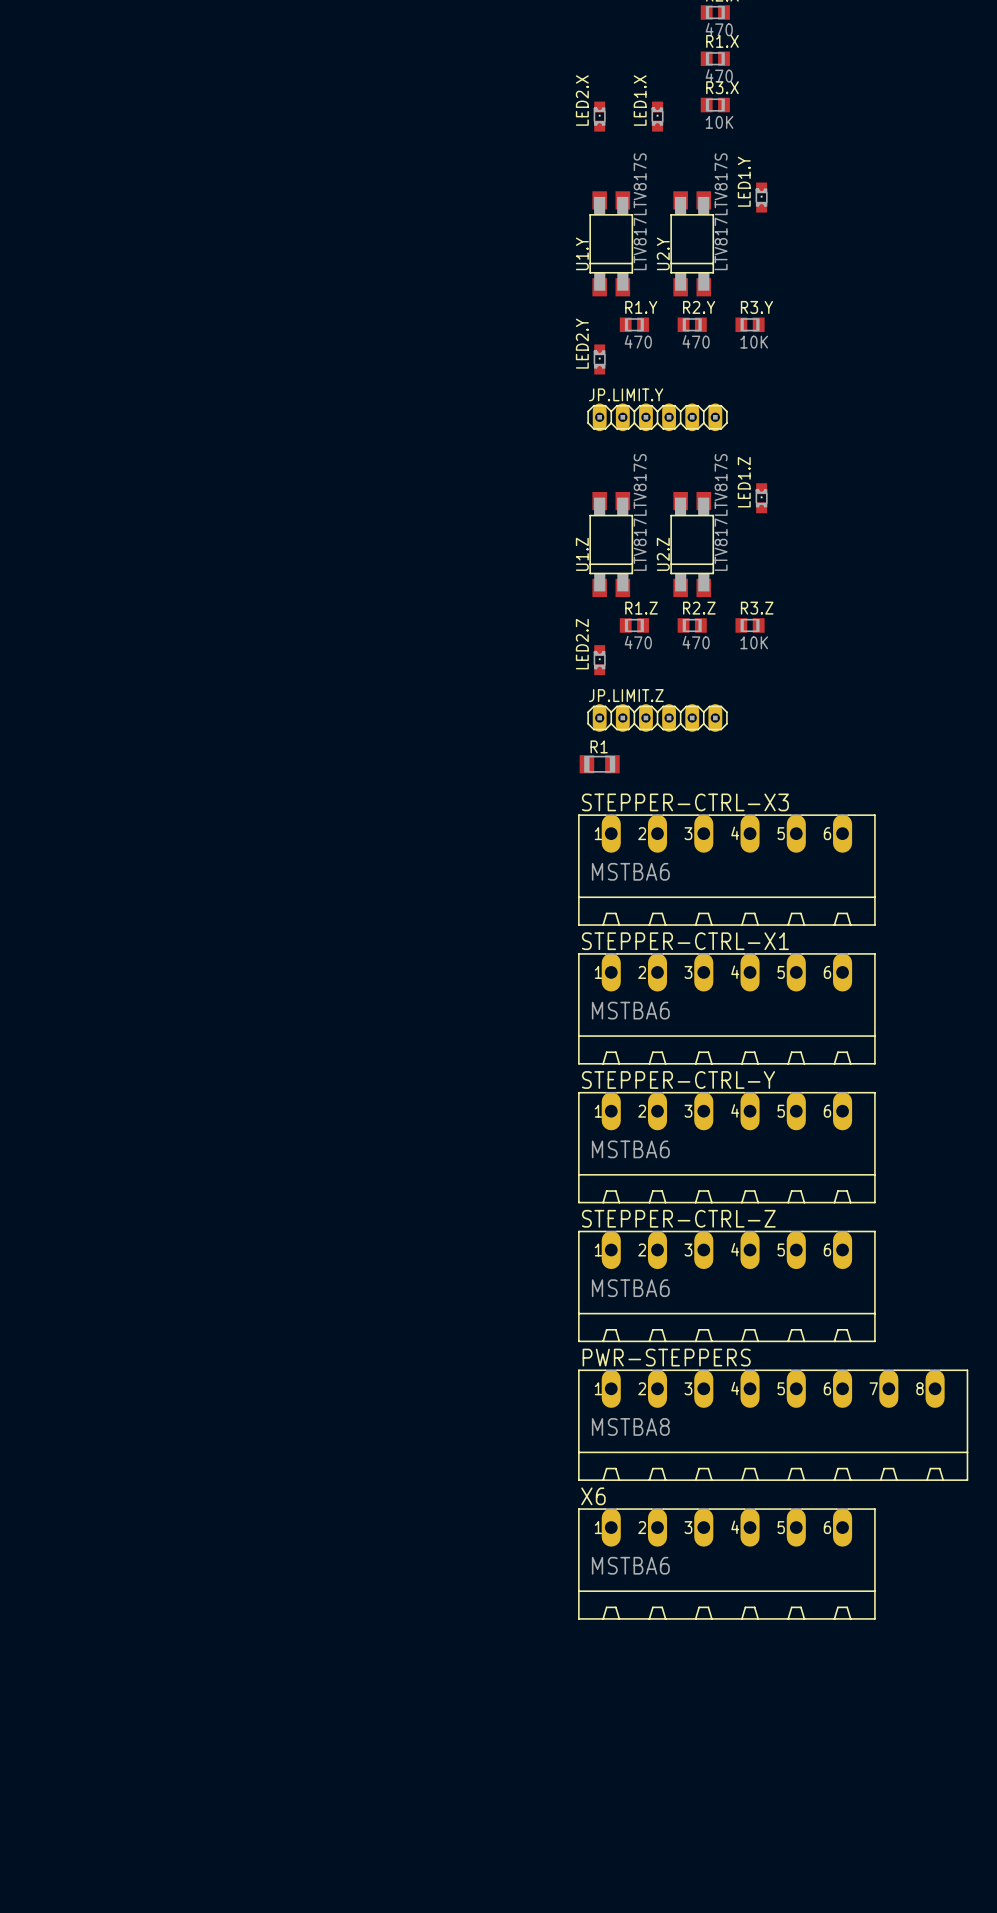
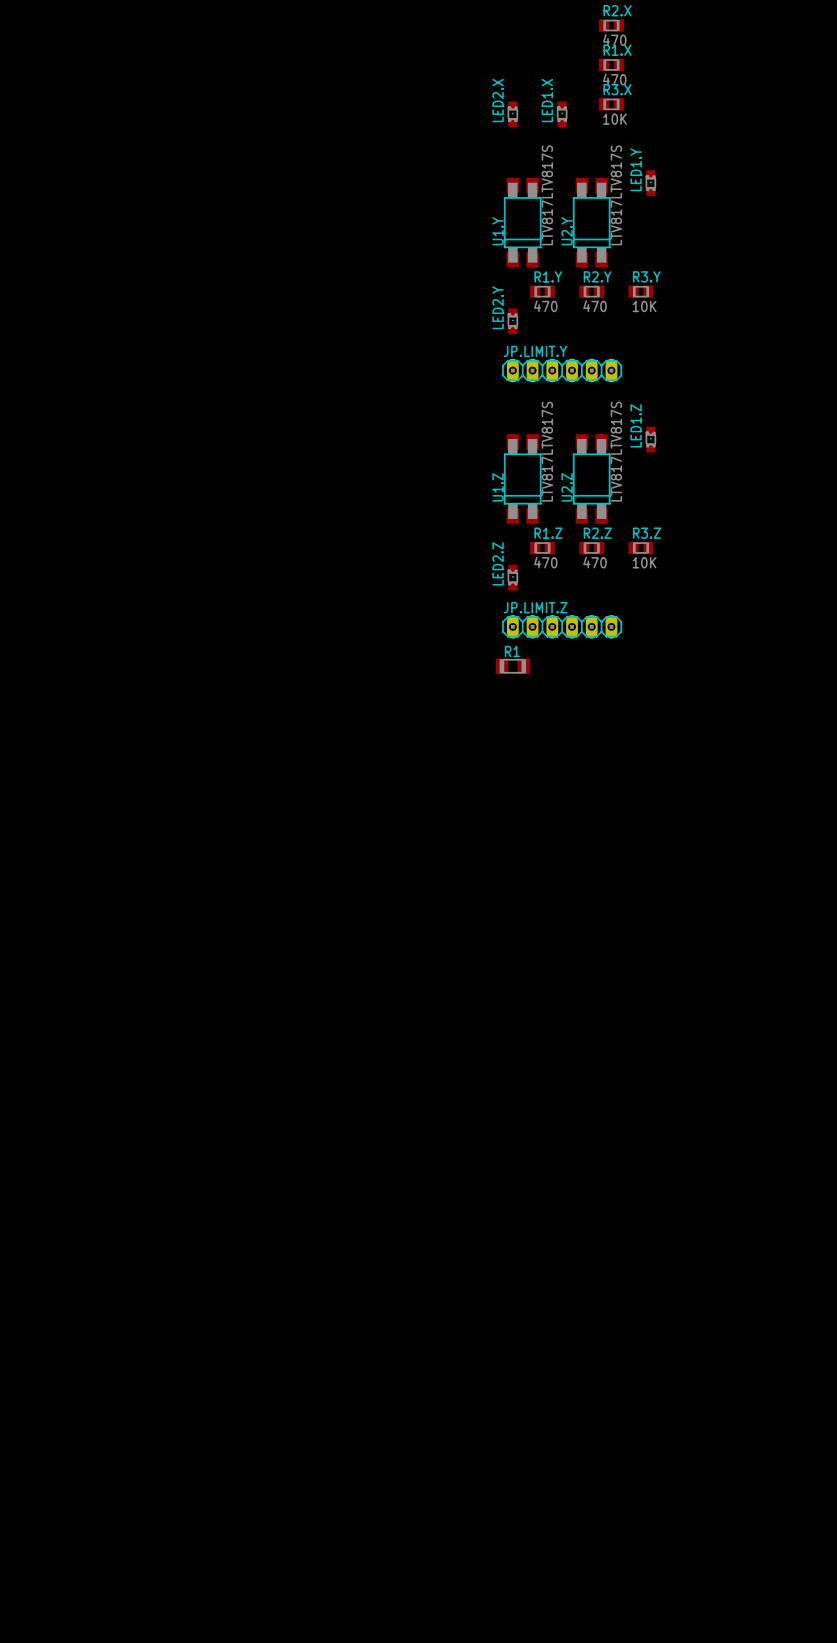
STEPPER-CTRL-X3: MSTBA6 (726, 870) -> none
STEPPER-CTRL-X1: MSTBA6 (726, 1008) -> none
STEPPER-CTRL-Y: MSTBA6 (726, 1147) -> none
STEPPER-CTRL-Z: MSTBA6 (726, 1286) -> none
PWR-STEPPERS: MSTBA8 (773, 1425) -> none
X6: MSTBA6 (726, 1564) -> none

